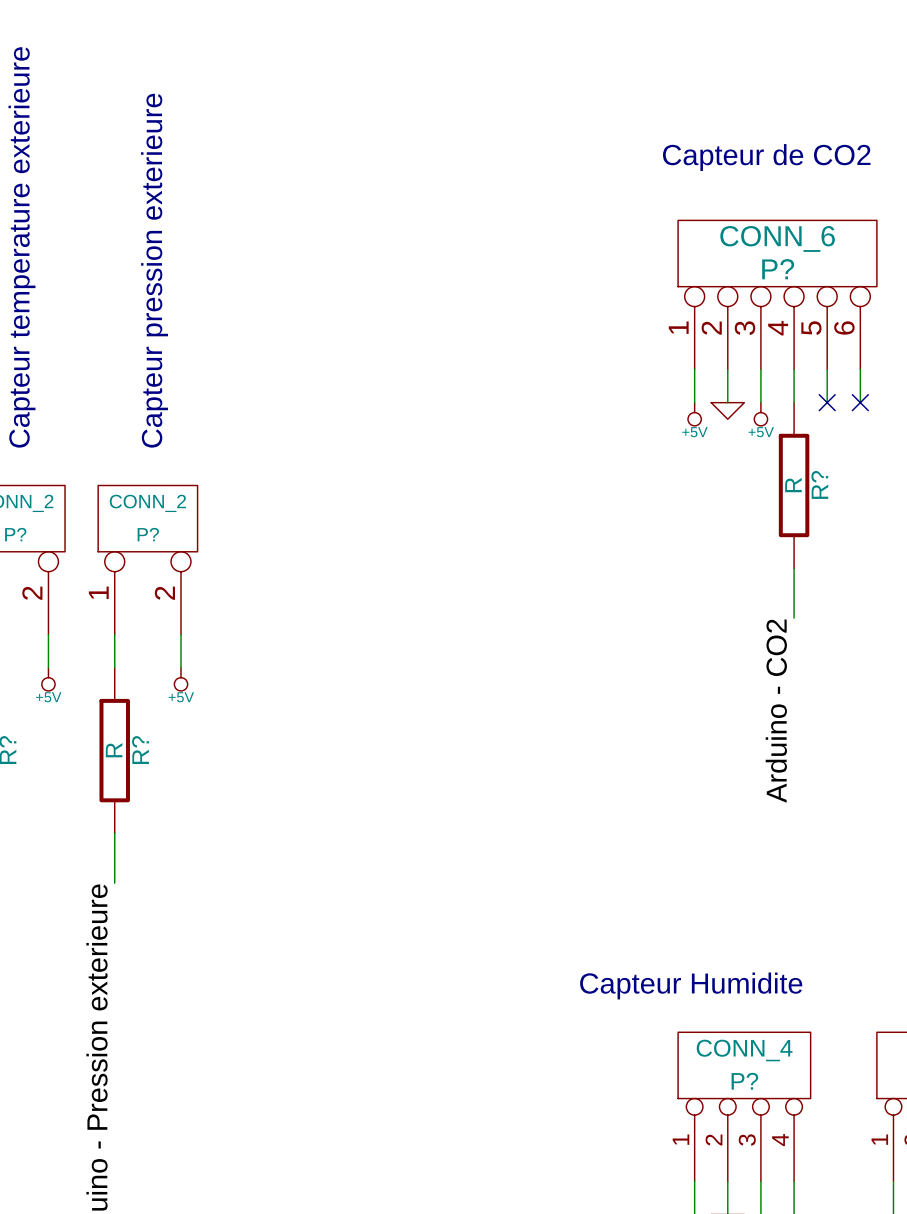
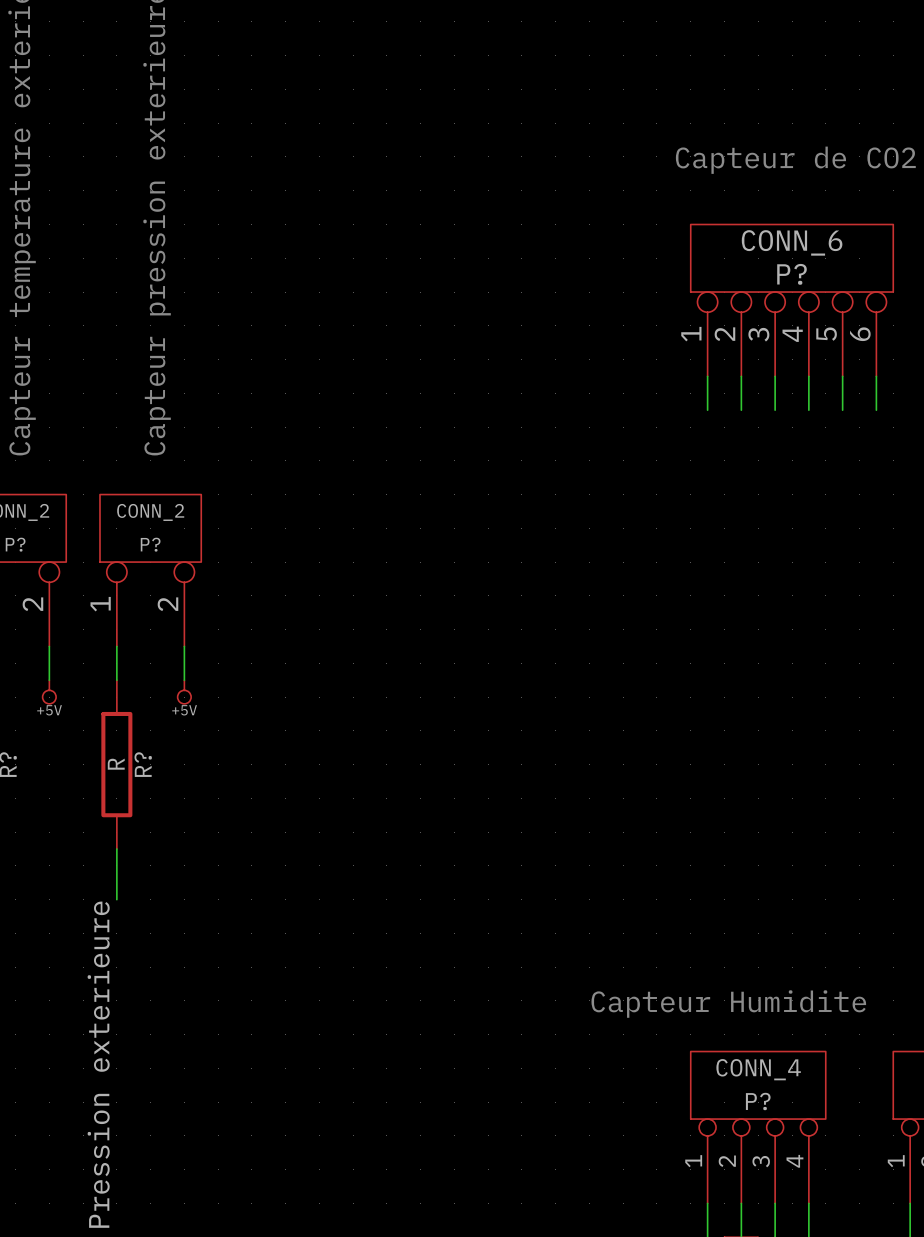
no-connect mark: (827, 402) -> none
no-connect mark: (860, 402) -> none
power symbol: (727, 410) -> none
power symbol: +5V (694, 414) -> none
power symbol: +5V (760, 414) -> none
R?: R (794, 485) -> none
wire: (794, 568) (794, 618) -> none
label: Arduino - CO2 (776, 711) -> none

